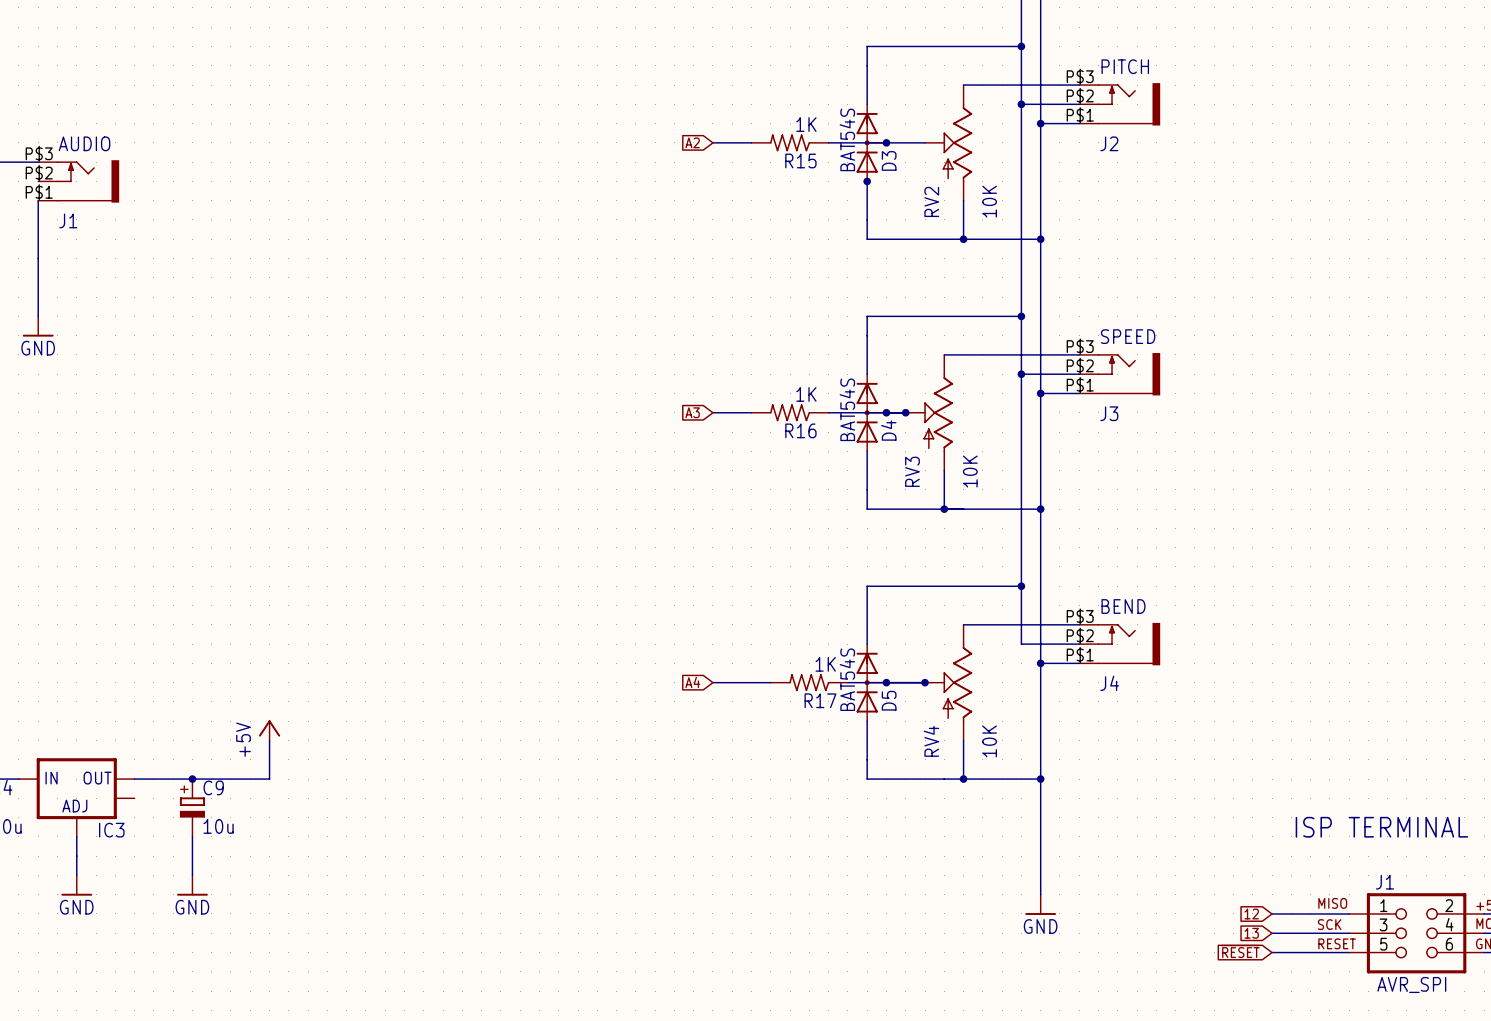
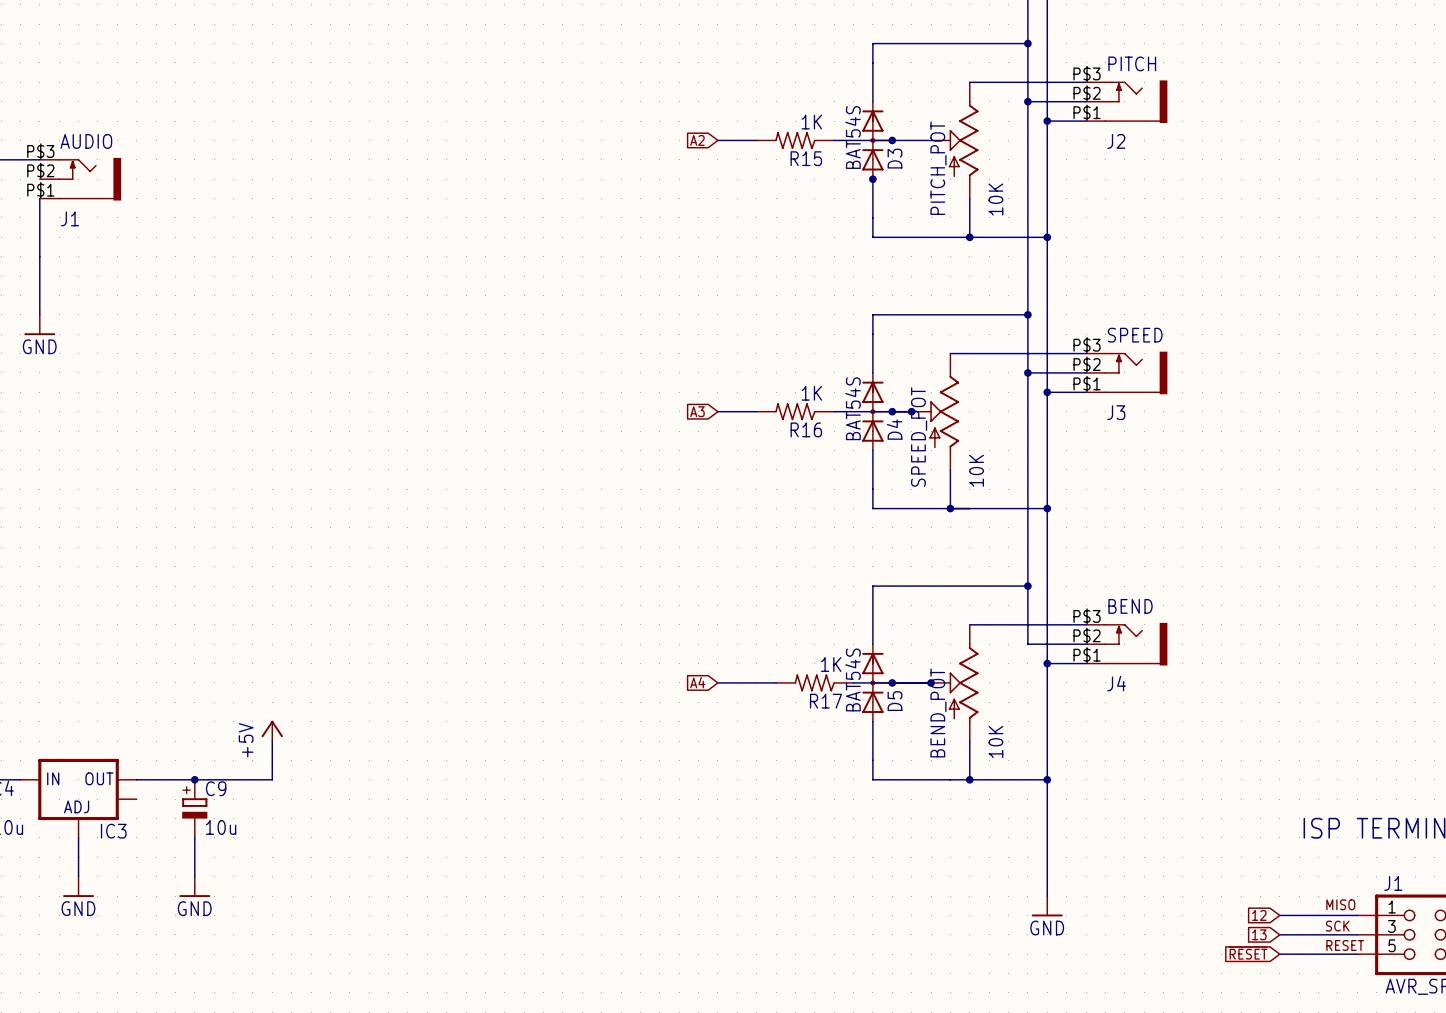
RV2 name: RV2 (931, 201) -> PITCH_POT (938, 168)
RV3 name: RV3 (912, 471) -> SPEED_POT (919, 437)
RV4 name: RV4 (931, 741) -> BEND_POT (938, 712)

